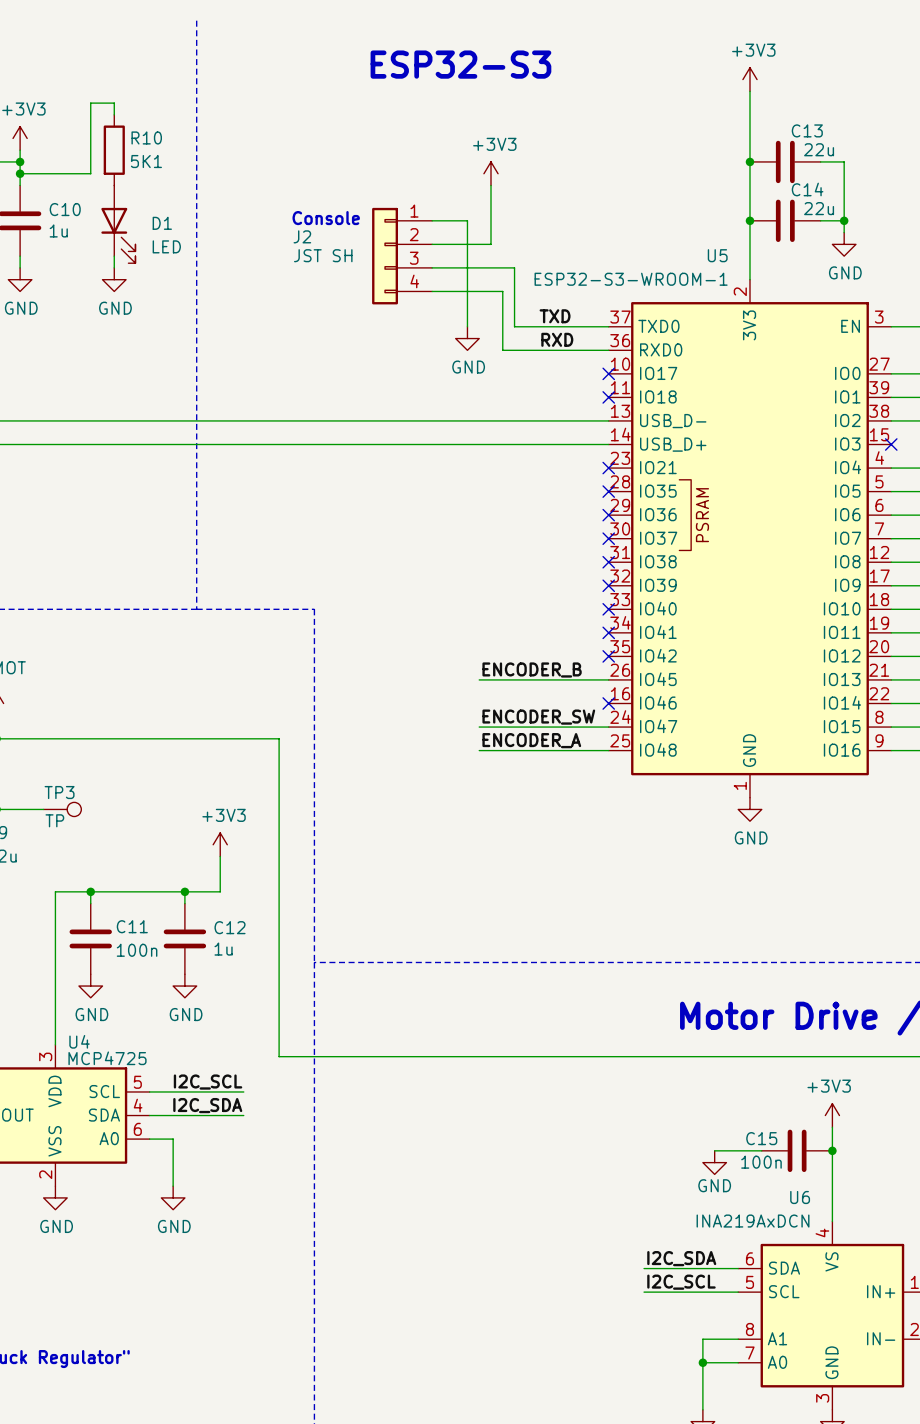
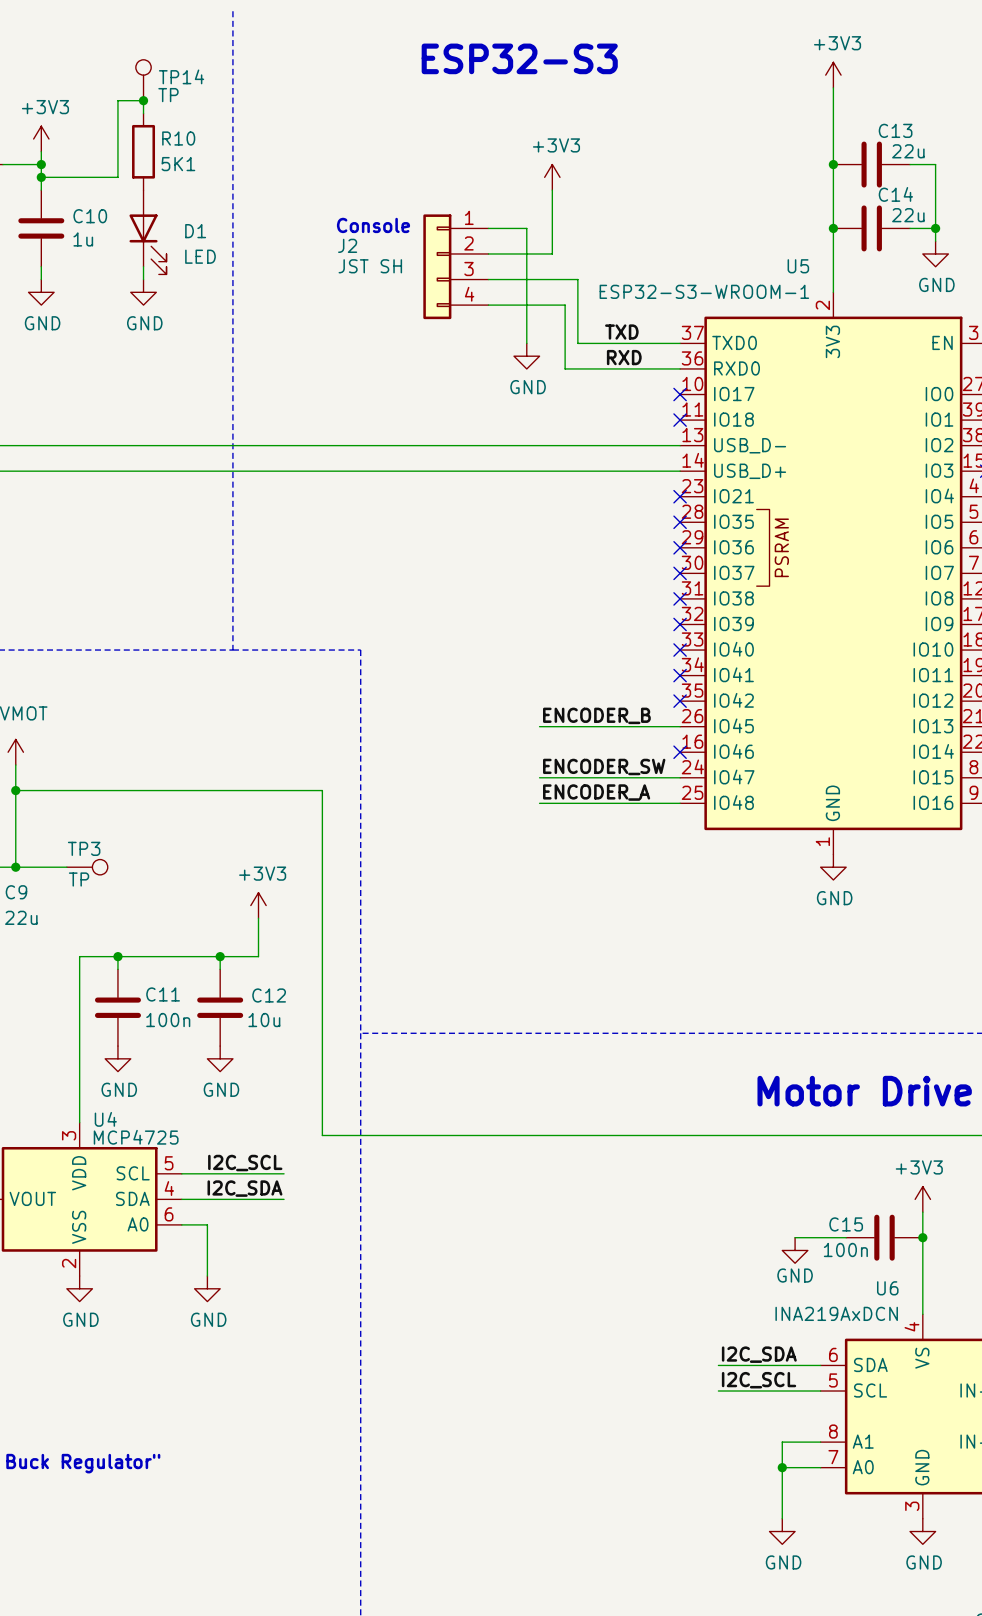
TP14: none -> TP (143, 80)
junction: none -> (143, 100)
C12 value: 1u (223, 949) -> 10u (264, 1020)

